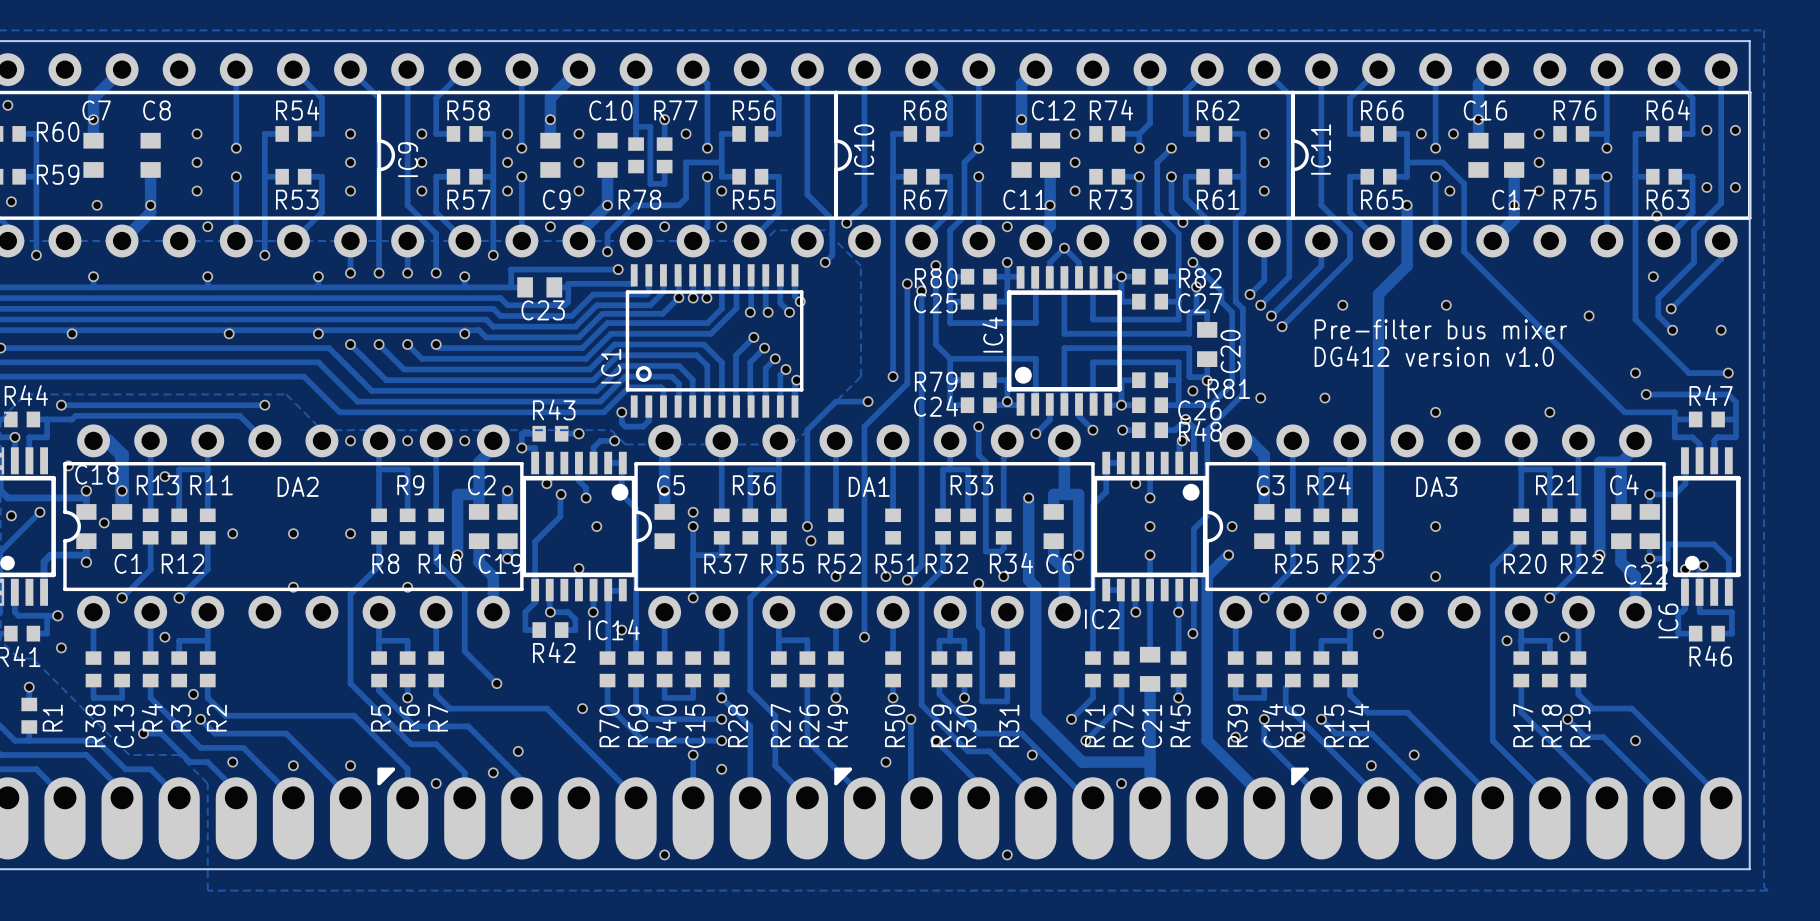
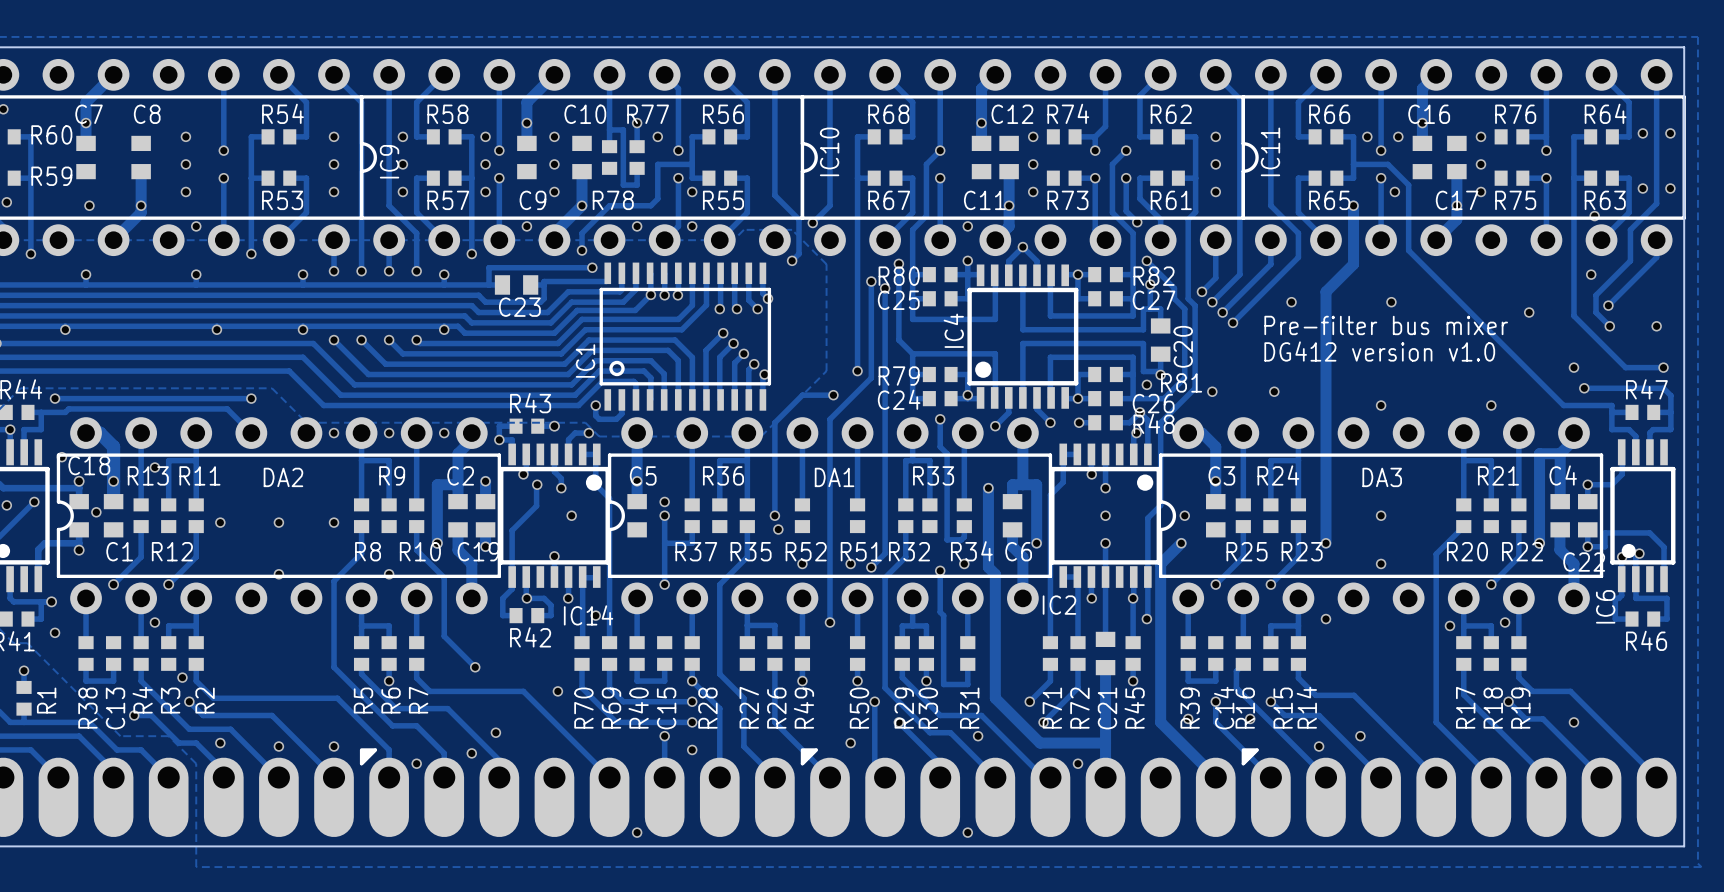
via position: (1032, 754) -> (978, 736)

